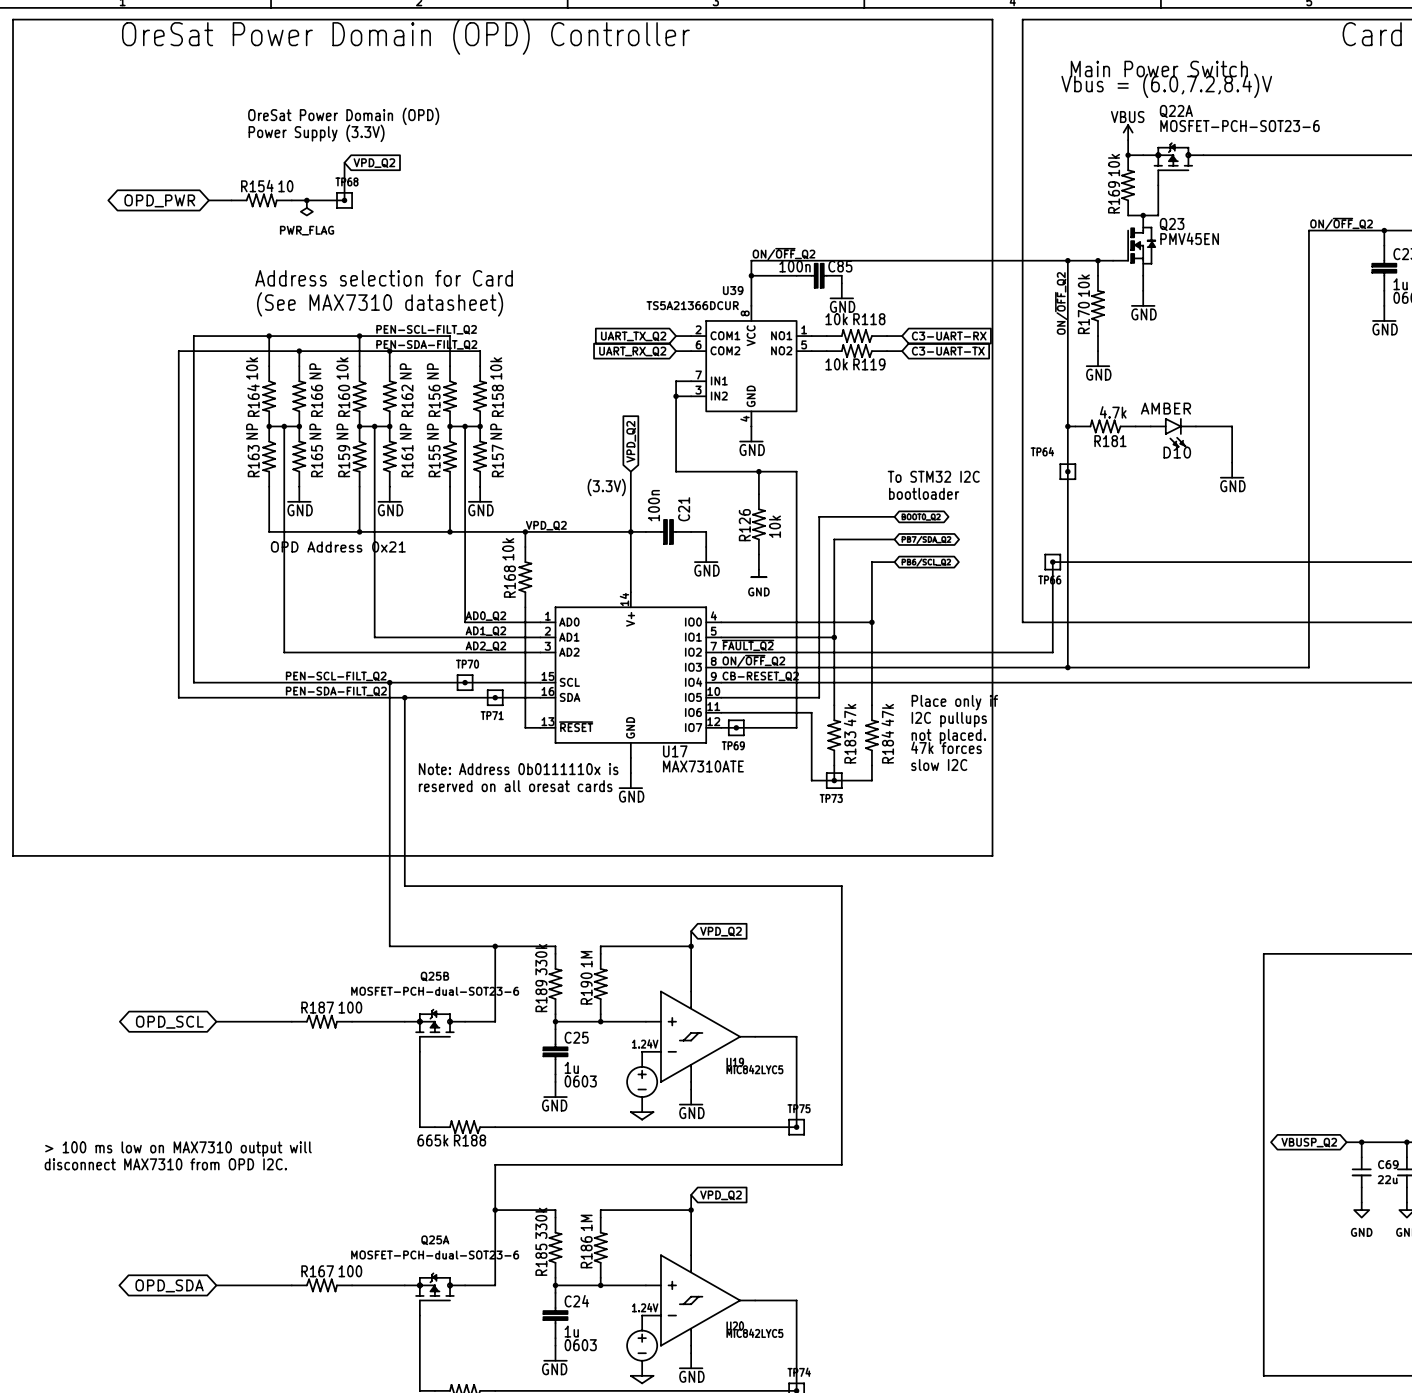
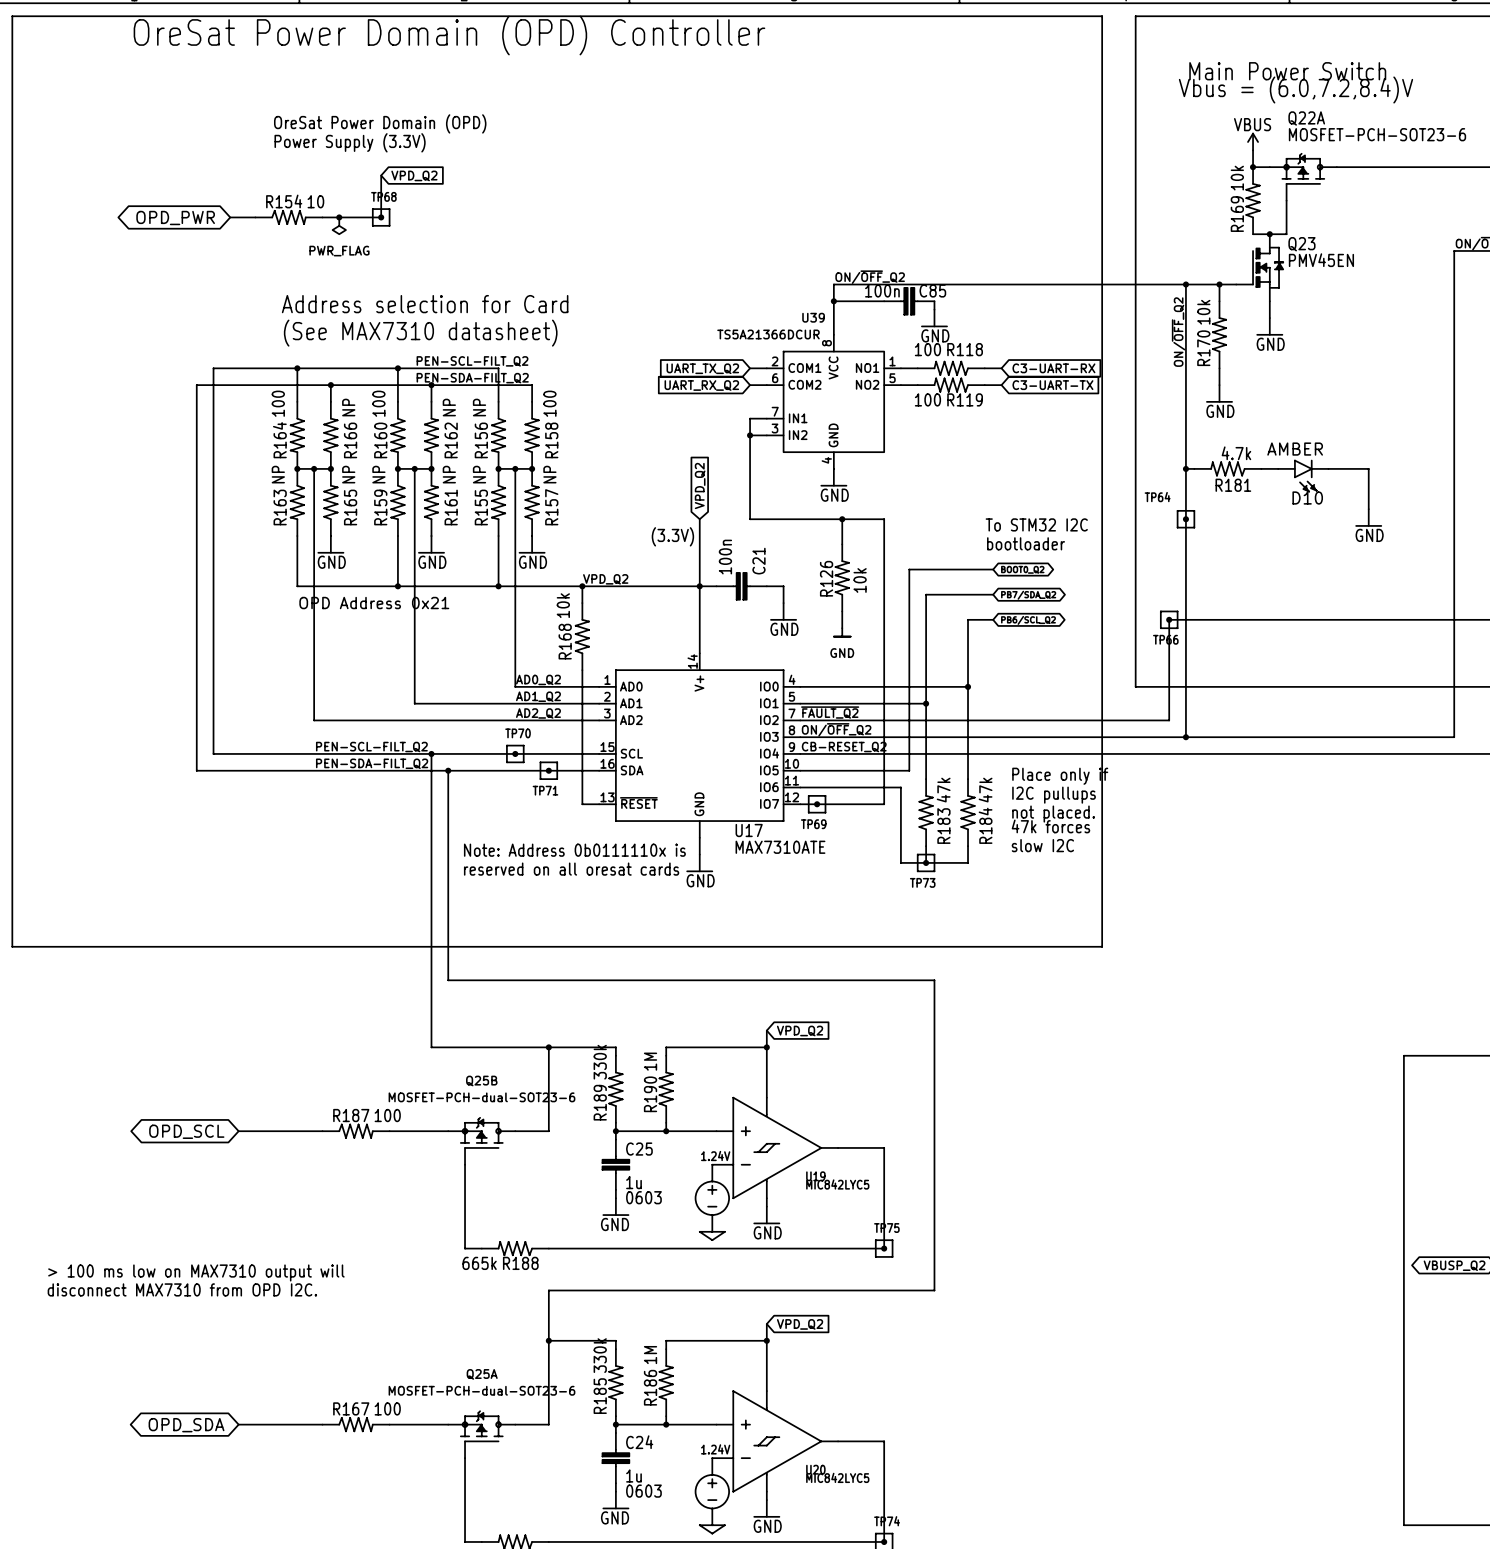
R118 value: 10k (836, 319) -> 100 (927, 349)
R119 value: 10k (836, 364) -> 100 (927, 399)
R164 value: 10k (252, 368) -> 100 (278, 403)
R160 value: 10k (342, 368) -> 100 (378, 403)
R158 value: 10k (496, 368) -> 100 (549, 403)

